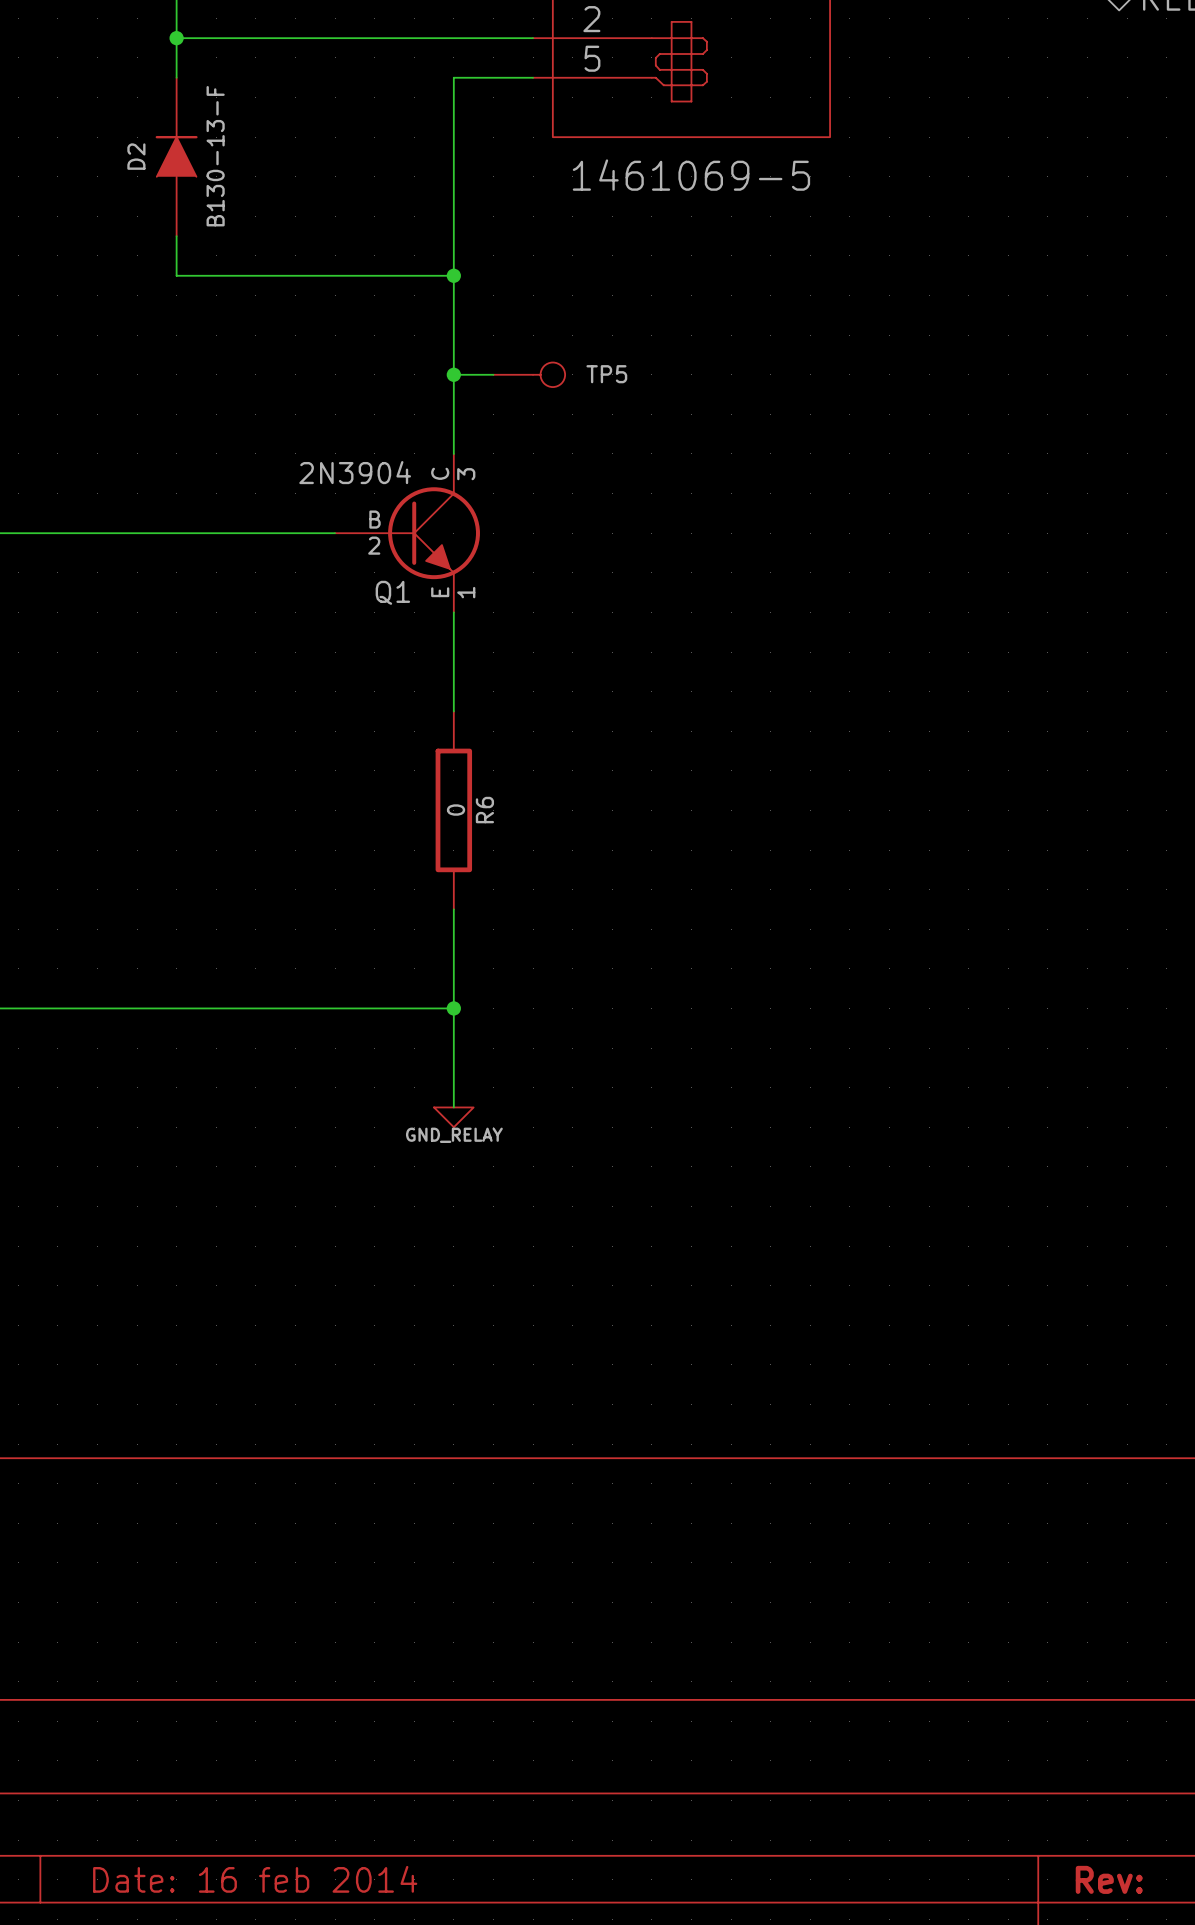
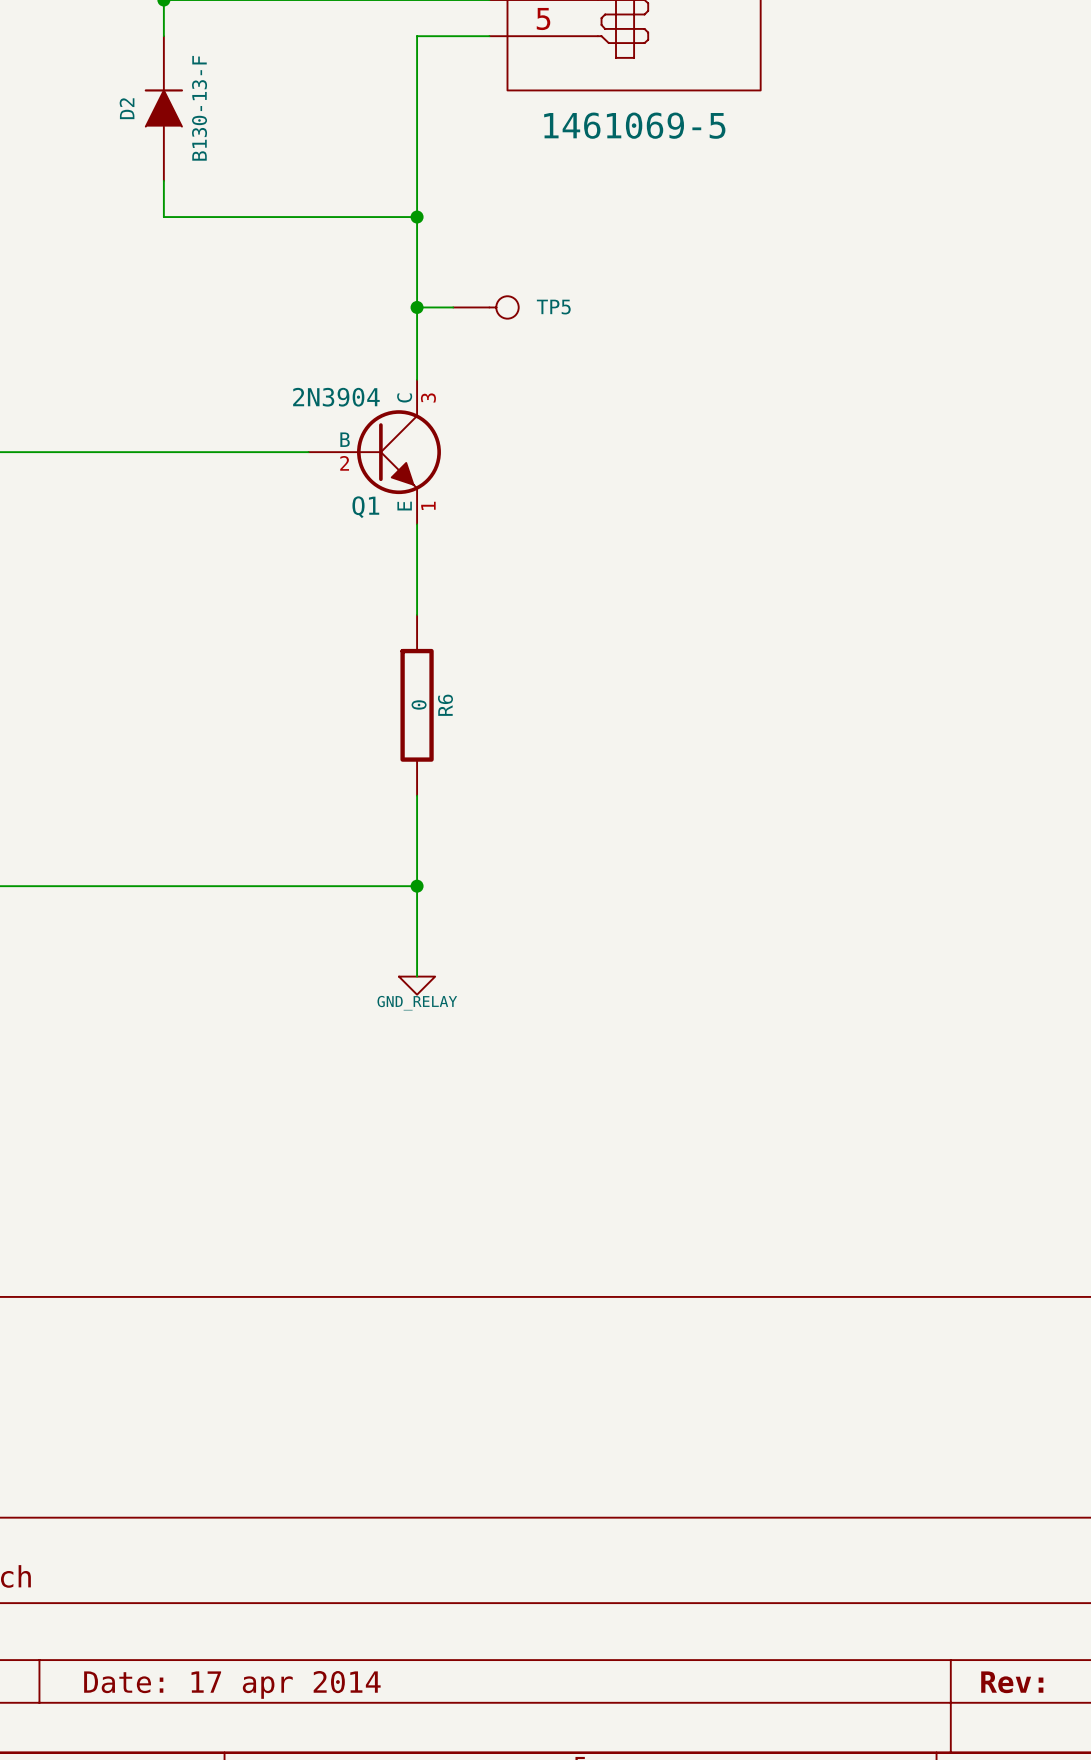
title block: Date: 16 feb 2014 (255, 1879) -> Date: 17 apr 2014 (232, 1684)

